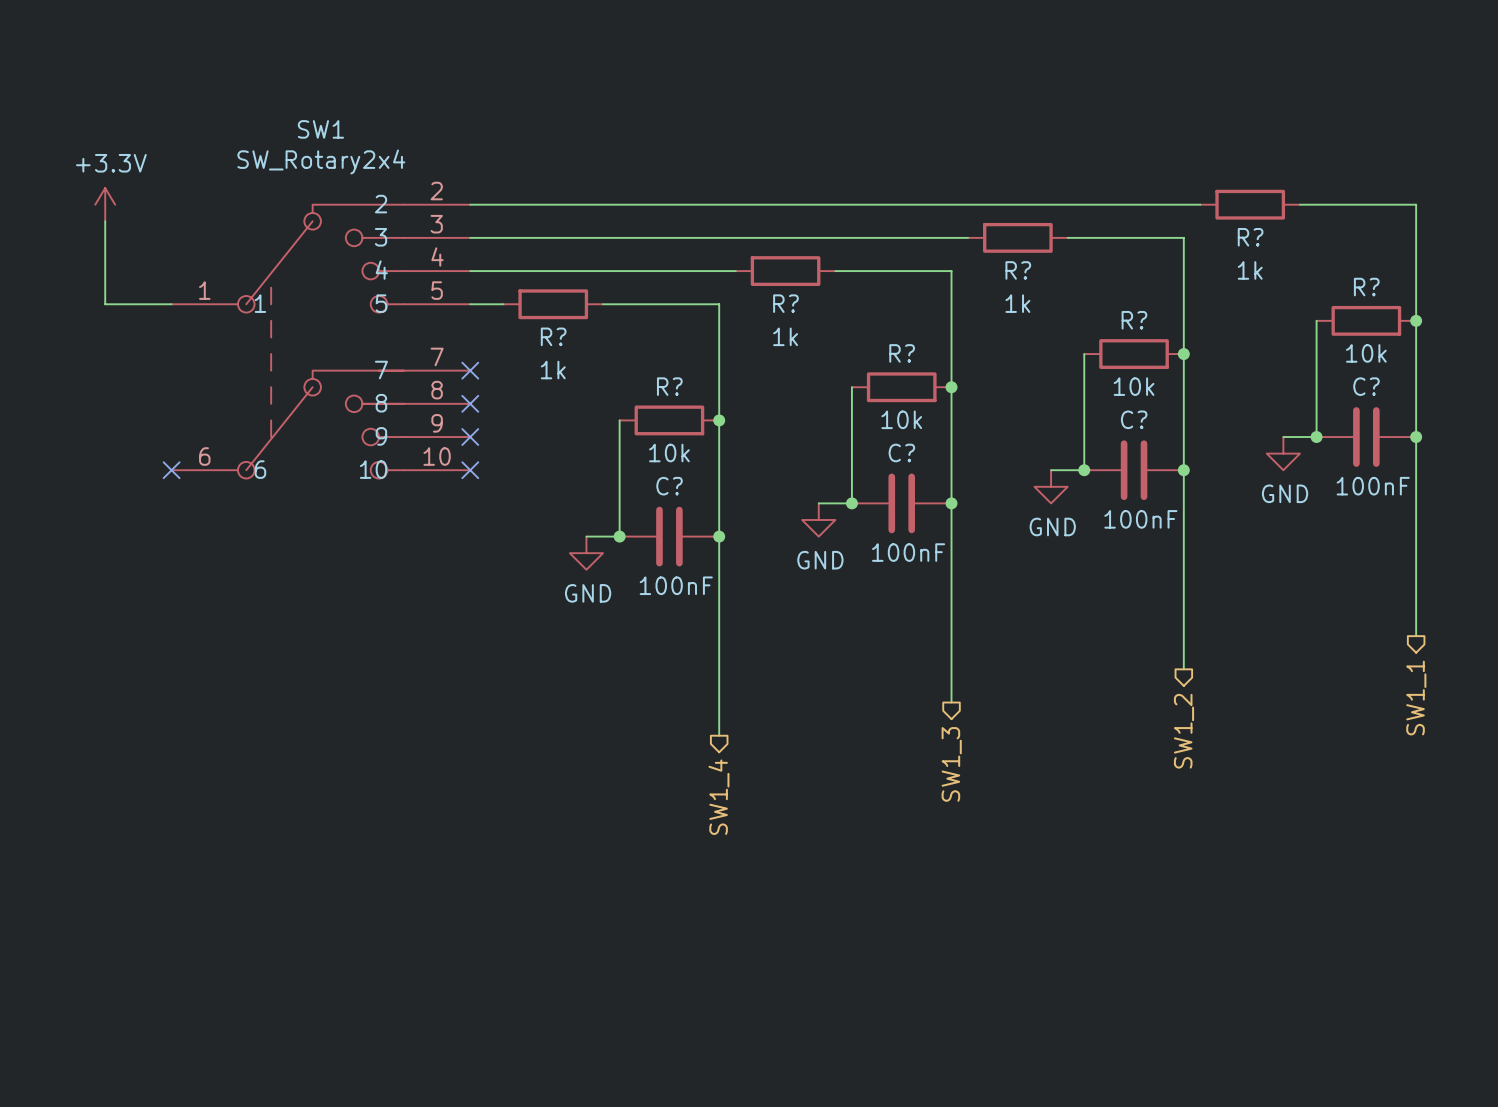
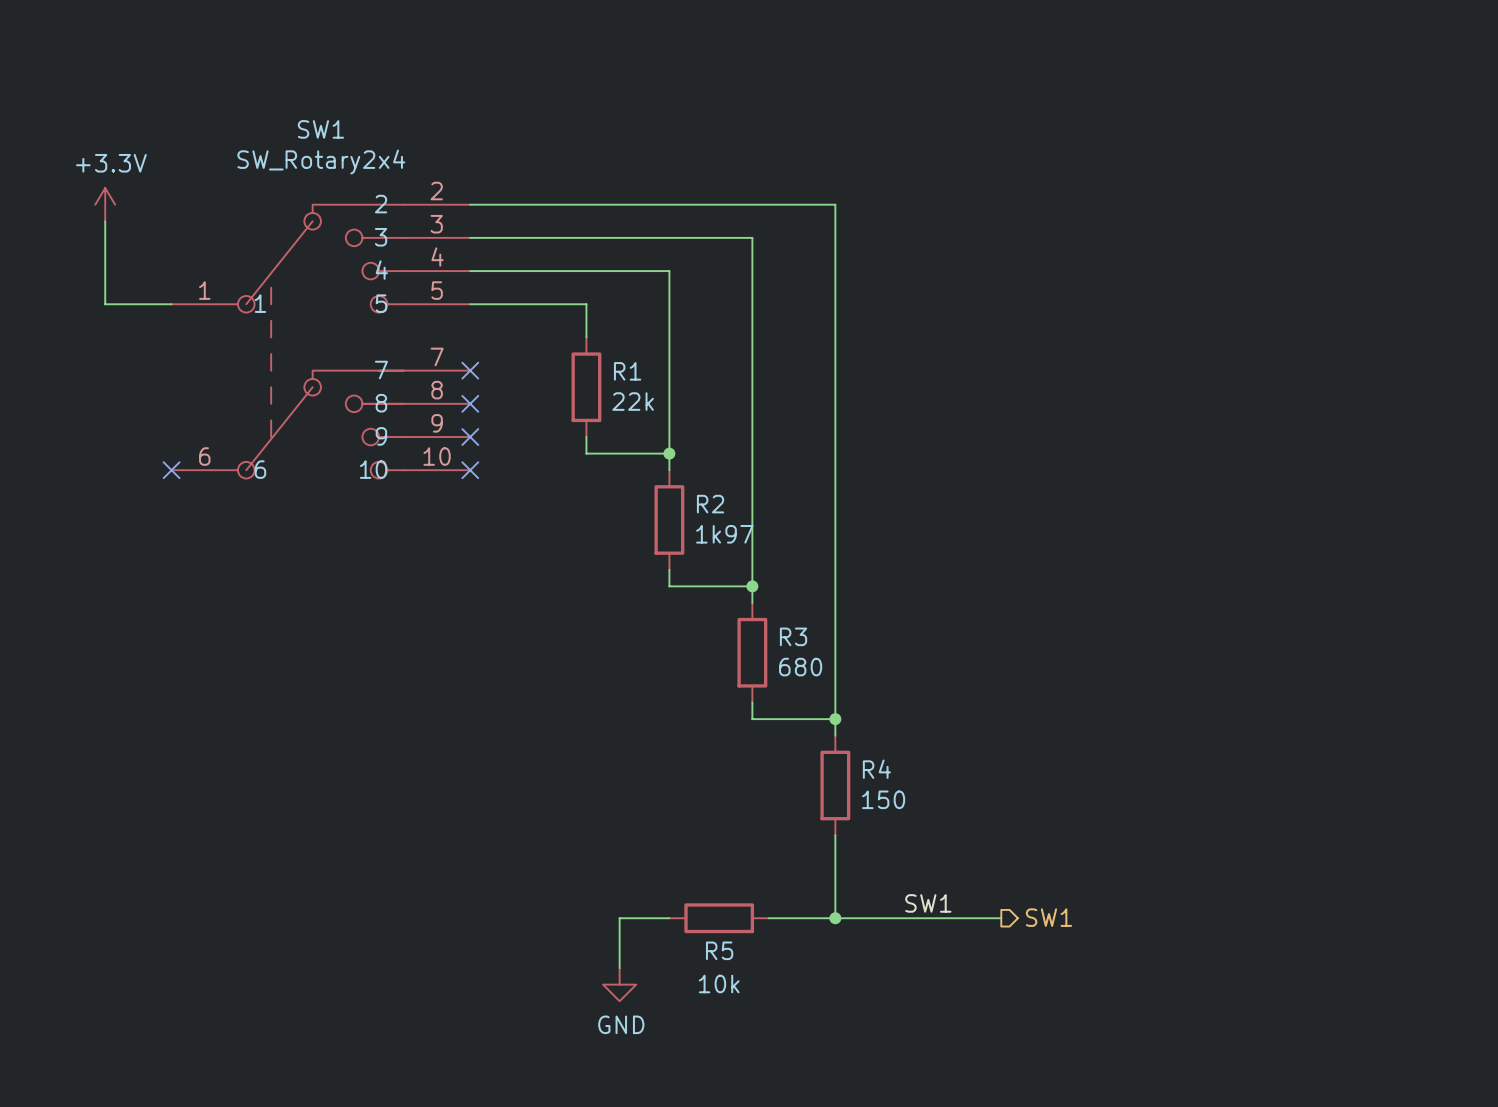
wire: (835, 204) (1200, 204) -> (835, 204) (835, 735)
R?: 1k (1250, 204) -> none
wire: (1299, 204) (1416, 204) (1416, 636) -> none
wire: (752, 237) (968, 237) -> (752, 237) (752, 602)
R?: 1k (1017, 237) -> none
wire: (1067, 237) (1183, 237) (1183, 669) -> none
wire: (669, 271) (735, 271) -> (669, 271) (669, 470)
R?: 1k (785, 271) -> none
wire: (835, 271) (951, 271) (951, 702) -> none
wire: none -> (503, 304) (586, 304) (586, 337)
R?: 1k (553, 304) -> none
wire: (603, 304) (719, 304) (719, 735) -> none
wire: (1316, 320) (1316, 437) (1283, 437) -> none
R?: 10k (1366, 320) -> none
junction: (1416, 320) -> none
wire: (1084, 354) (1084, 470) (1051, 470) -> none
R?: 10k (1134, 354) -> none
junction: (1183, 354) -> none
R1: none -> 22k (586, 387)
wire: (851, 387) (851, 503) (818, 503) -> none
R?: 10k (901, 387) -> none
junction: (951, 387) -> none
wire: (619, 420) (619, 536) (586, 536) -> none
R?: 10k (669, 420) -> none
junction: (719, 420) -> none
wire: none -> (586, 437) (586, 453) (669, 453)
junction: (1316, 437) -> none
C?: 100nF (1366, 437) -> none
junction: (1416, 437) -> none
junction: none -> (669, 453)
power symbol: GND (1283, 453) -> none
junction: (1084, 470) -> none
C?: 100nF (1134, 470) -> none
junction: (1183, 470) -> none
power symbol: GND (1051, 486) -> none
junction: (851, 503) -> none
C?: 100nF (901, 503) -> none
junction: (951, 503) -> none
R2: none -> 1k97 (669, 519)
power symbol: GND (818, 519) -> none
junction: (619, 536) -> none
C?: 100nF (669, 536) -> none
junction: (719, 536) -> none
power symbol: GND (586, 553) -> none
wire: none -> (669, 569) (669, 586) (752, 586)
junction: none -> (752, 586)
R3: none -> 680 (752, 652)
hierarchical label: SW1_1 (1416, 698) -> none
wire: none -> (752, 702) (752, 719) (835, 719)
junction: none -> (835, 719)
hierarchical label: SW1_2 (1184, 731) -> none
hierarchical label: SW1_3 (951, 764) -> none
R4: none -> 150 (835, 785)
hierarchical label: SW1_4 (718, 797) -> none
wire: none -> (835, 835) (835, 918)
label: none -> SW1 (928, 903)
hierarchical label: none -> SW1 (1048, 917)
wire: none -> (669, 918) (619, 918) (619, 968)
R5: none -> 10k (719, 918)
wire: none -> (768, 918) (1001, 918)
junction: none -> (835, 918)
power symbol: none -> GND (619, 984)

